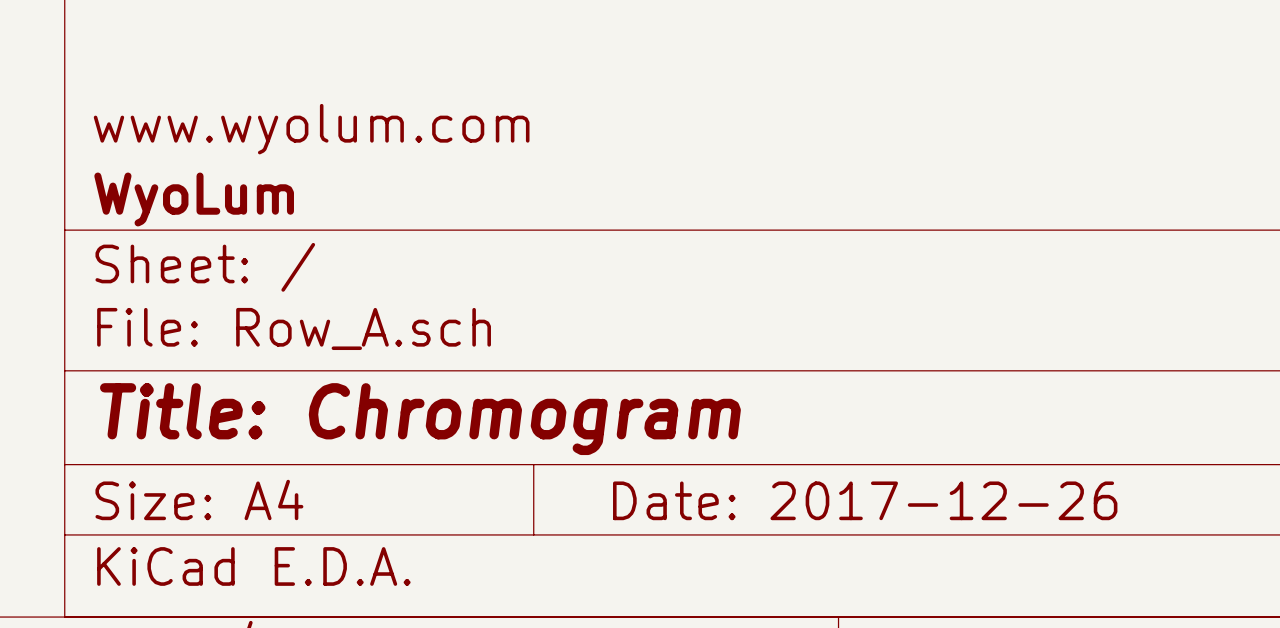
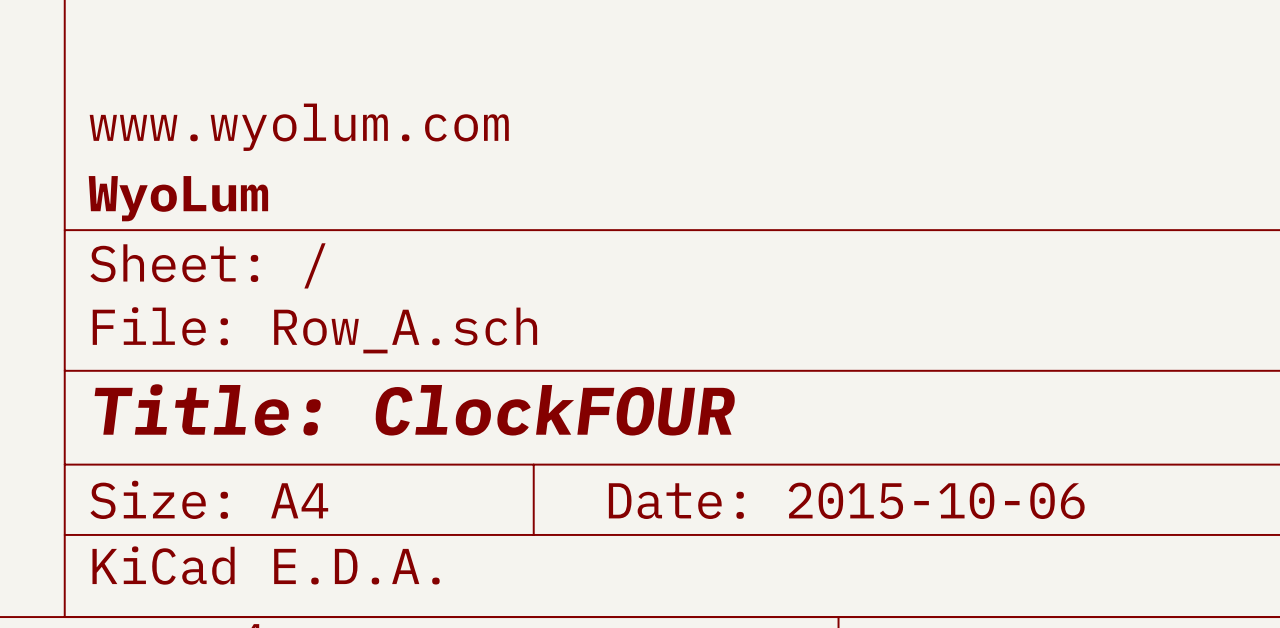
title block: Title: Chromogram (420, 419) -> Title: ClockFOUR (414, 409)
title block: Date: 2017-12-26 (865, 500) -> Date: 2015-10-06 (846, 500)

